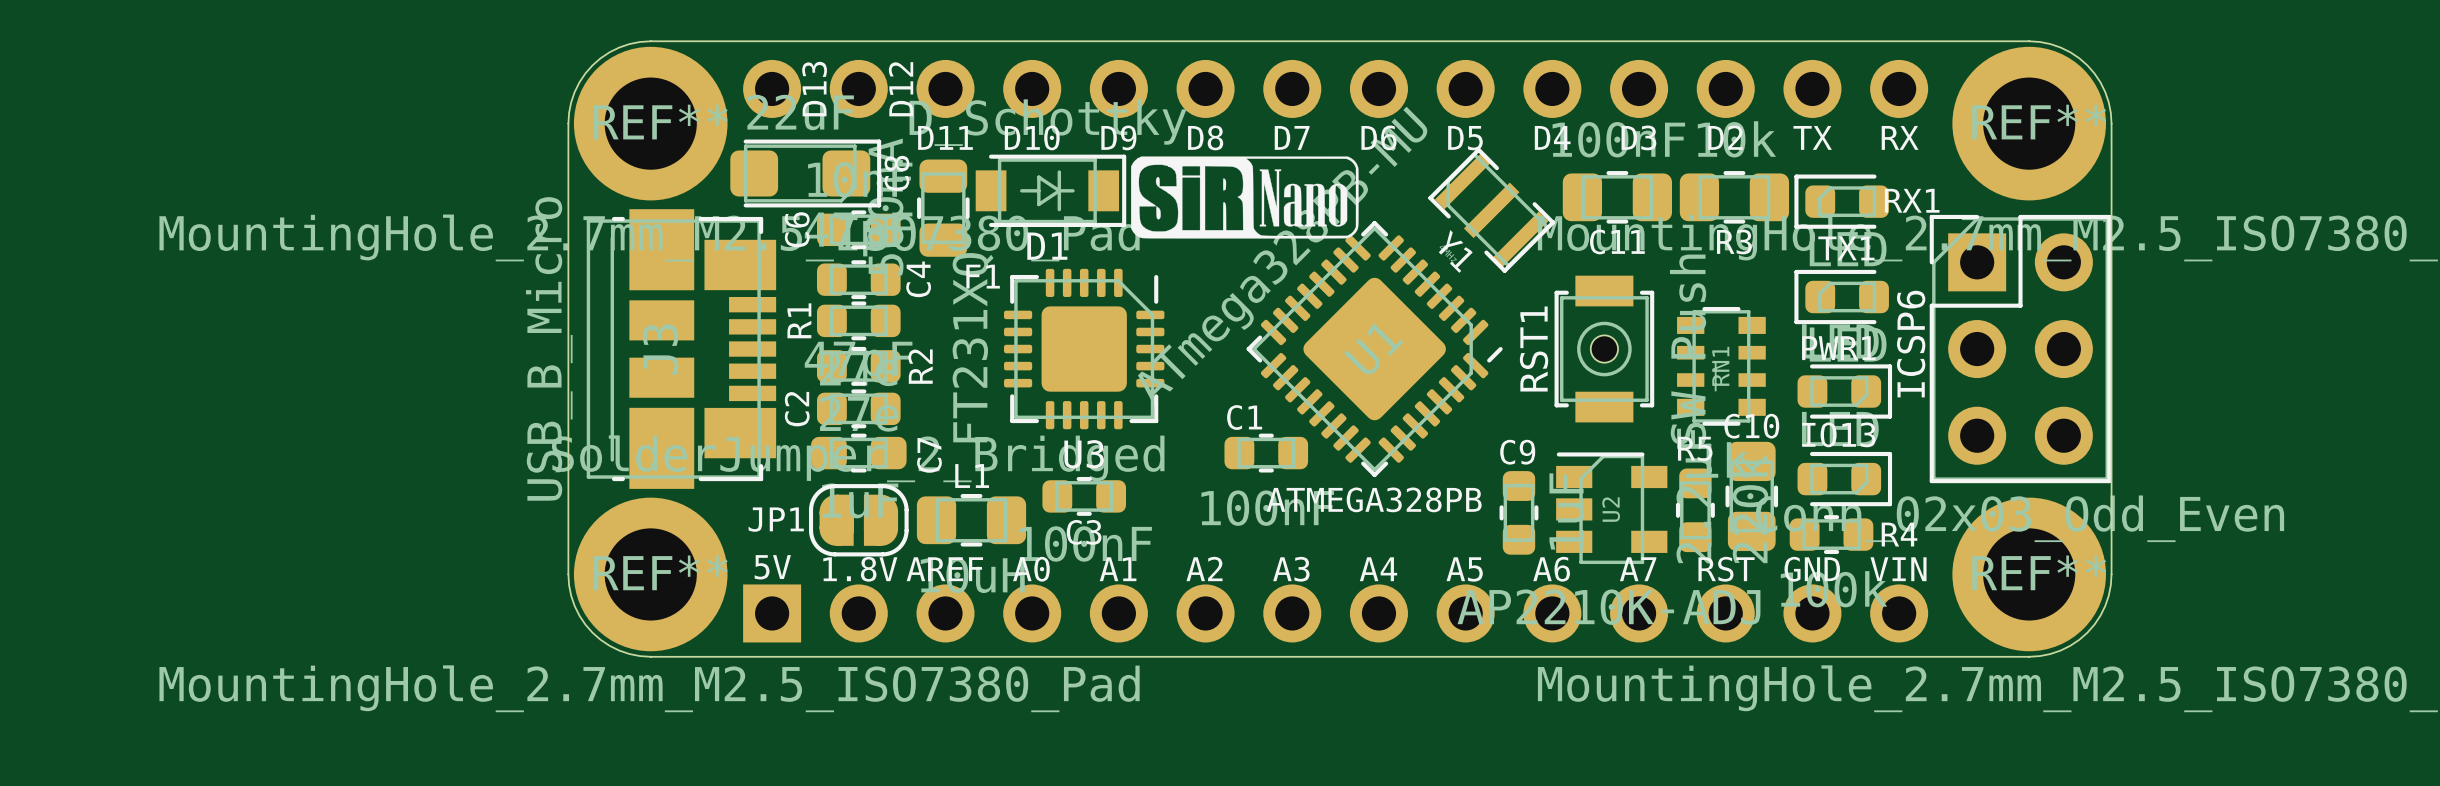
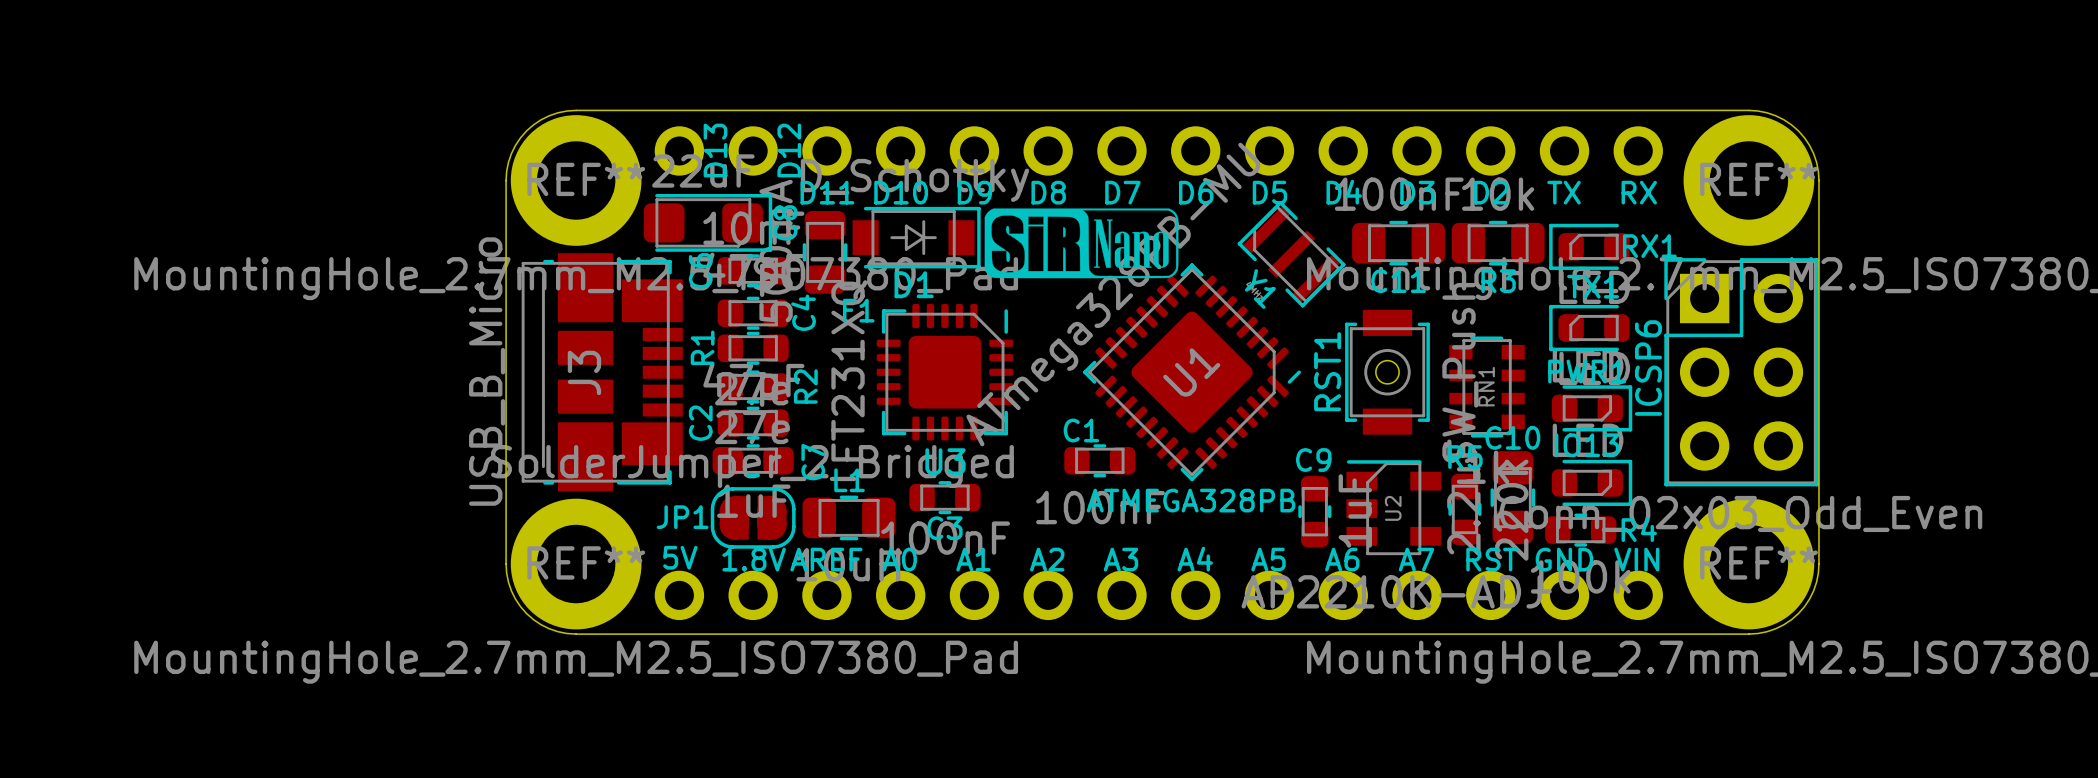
part footprint: [743, 584, 1929, 643] -> [654, 570, 1663, 621]

